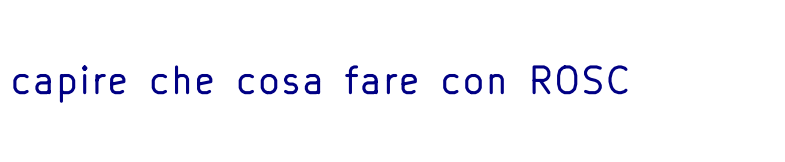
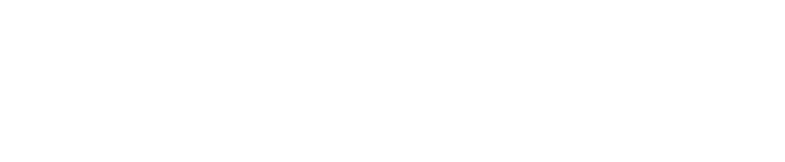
text: capire che cosa fare con ROSC (320, 84) -> none

